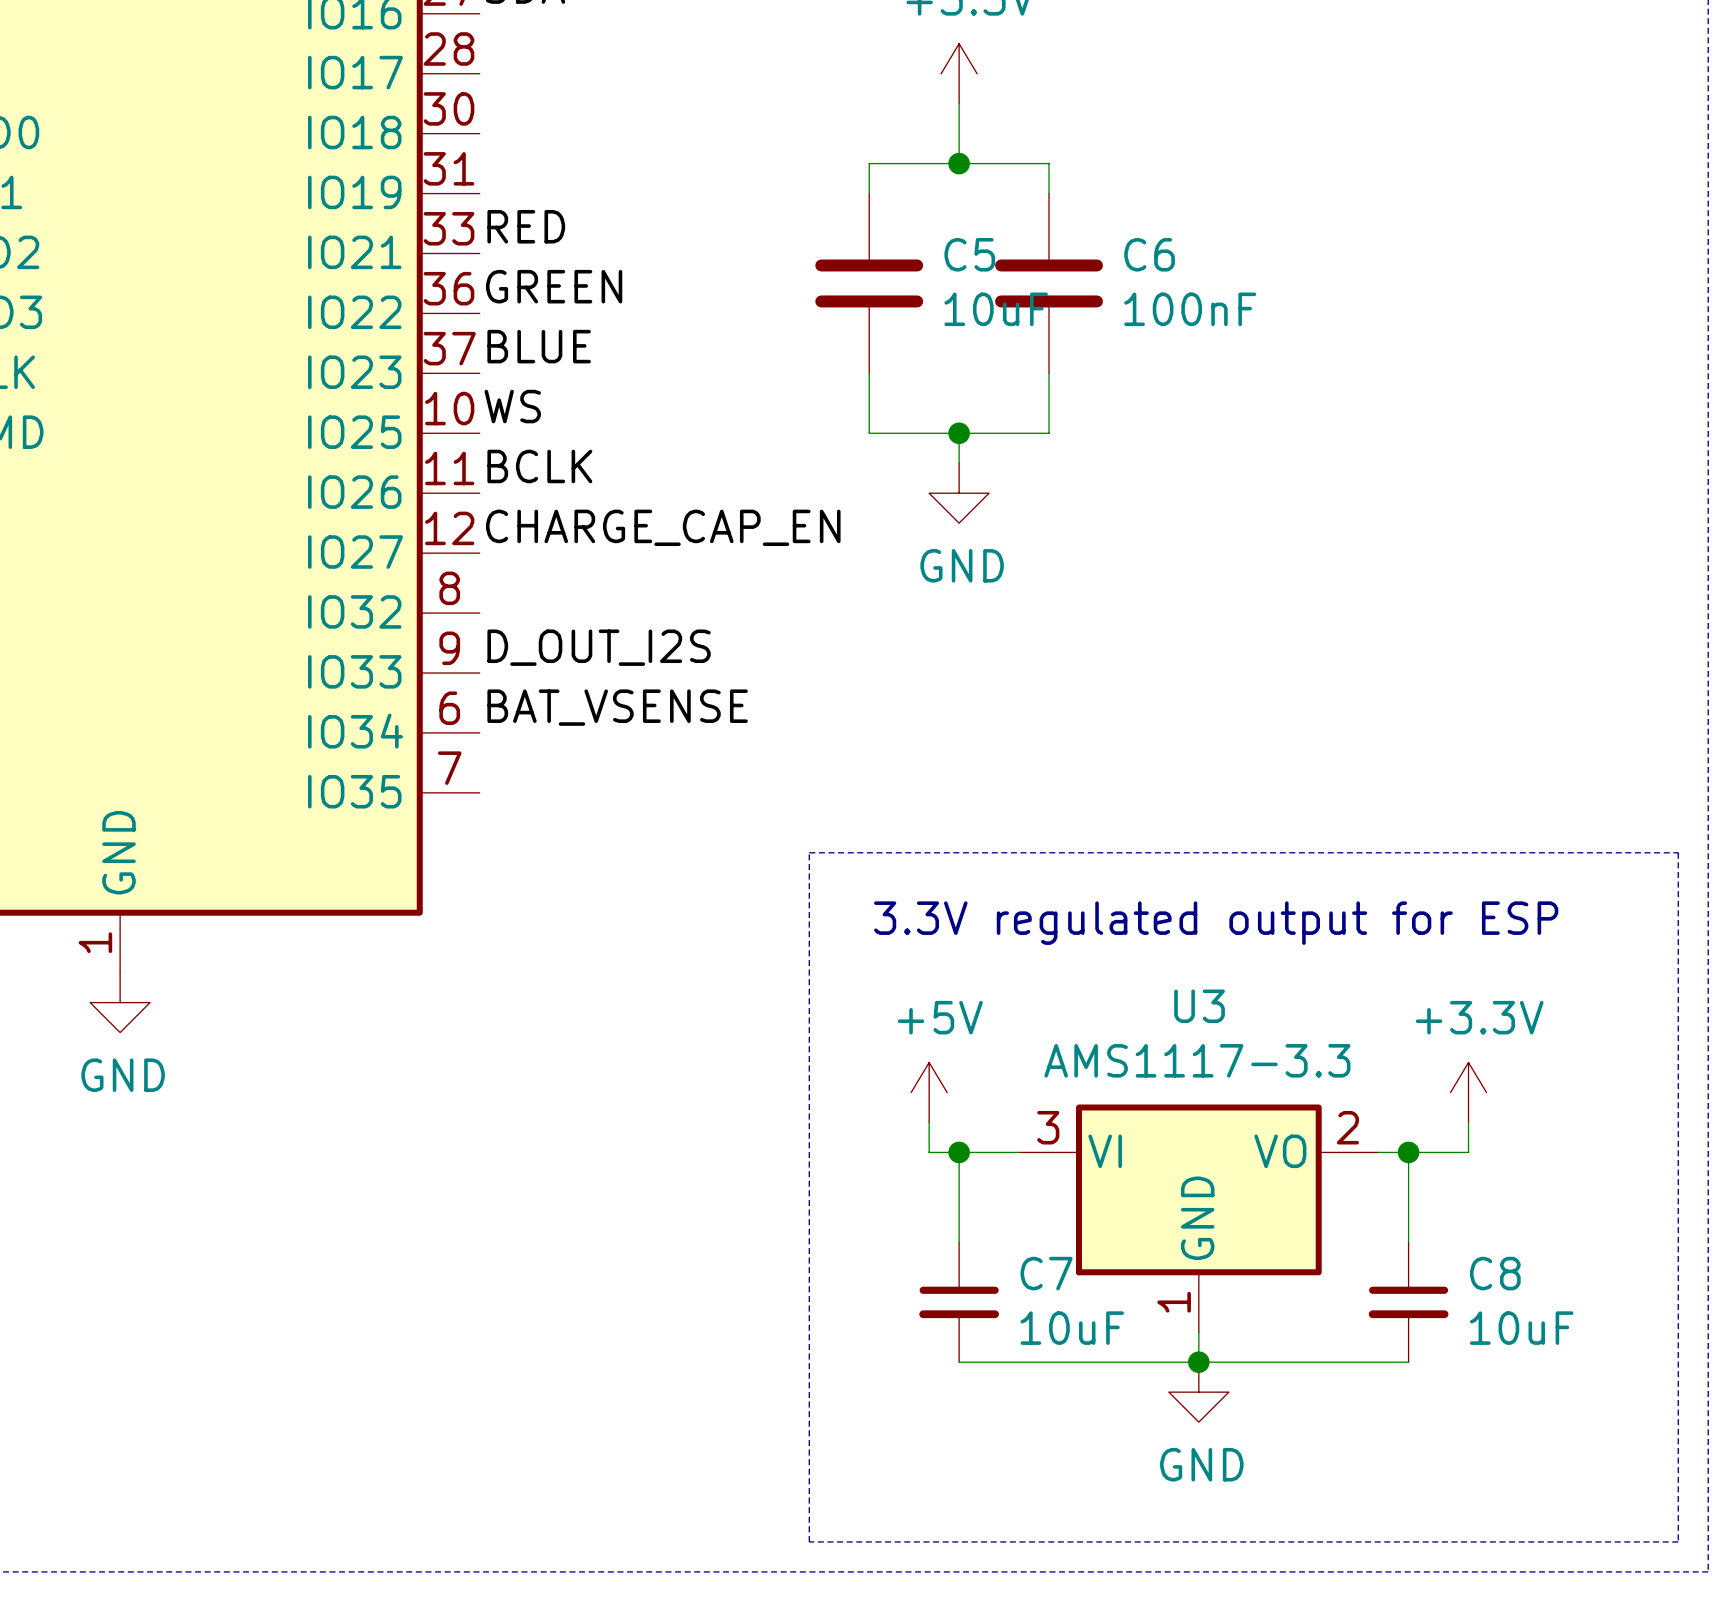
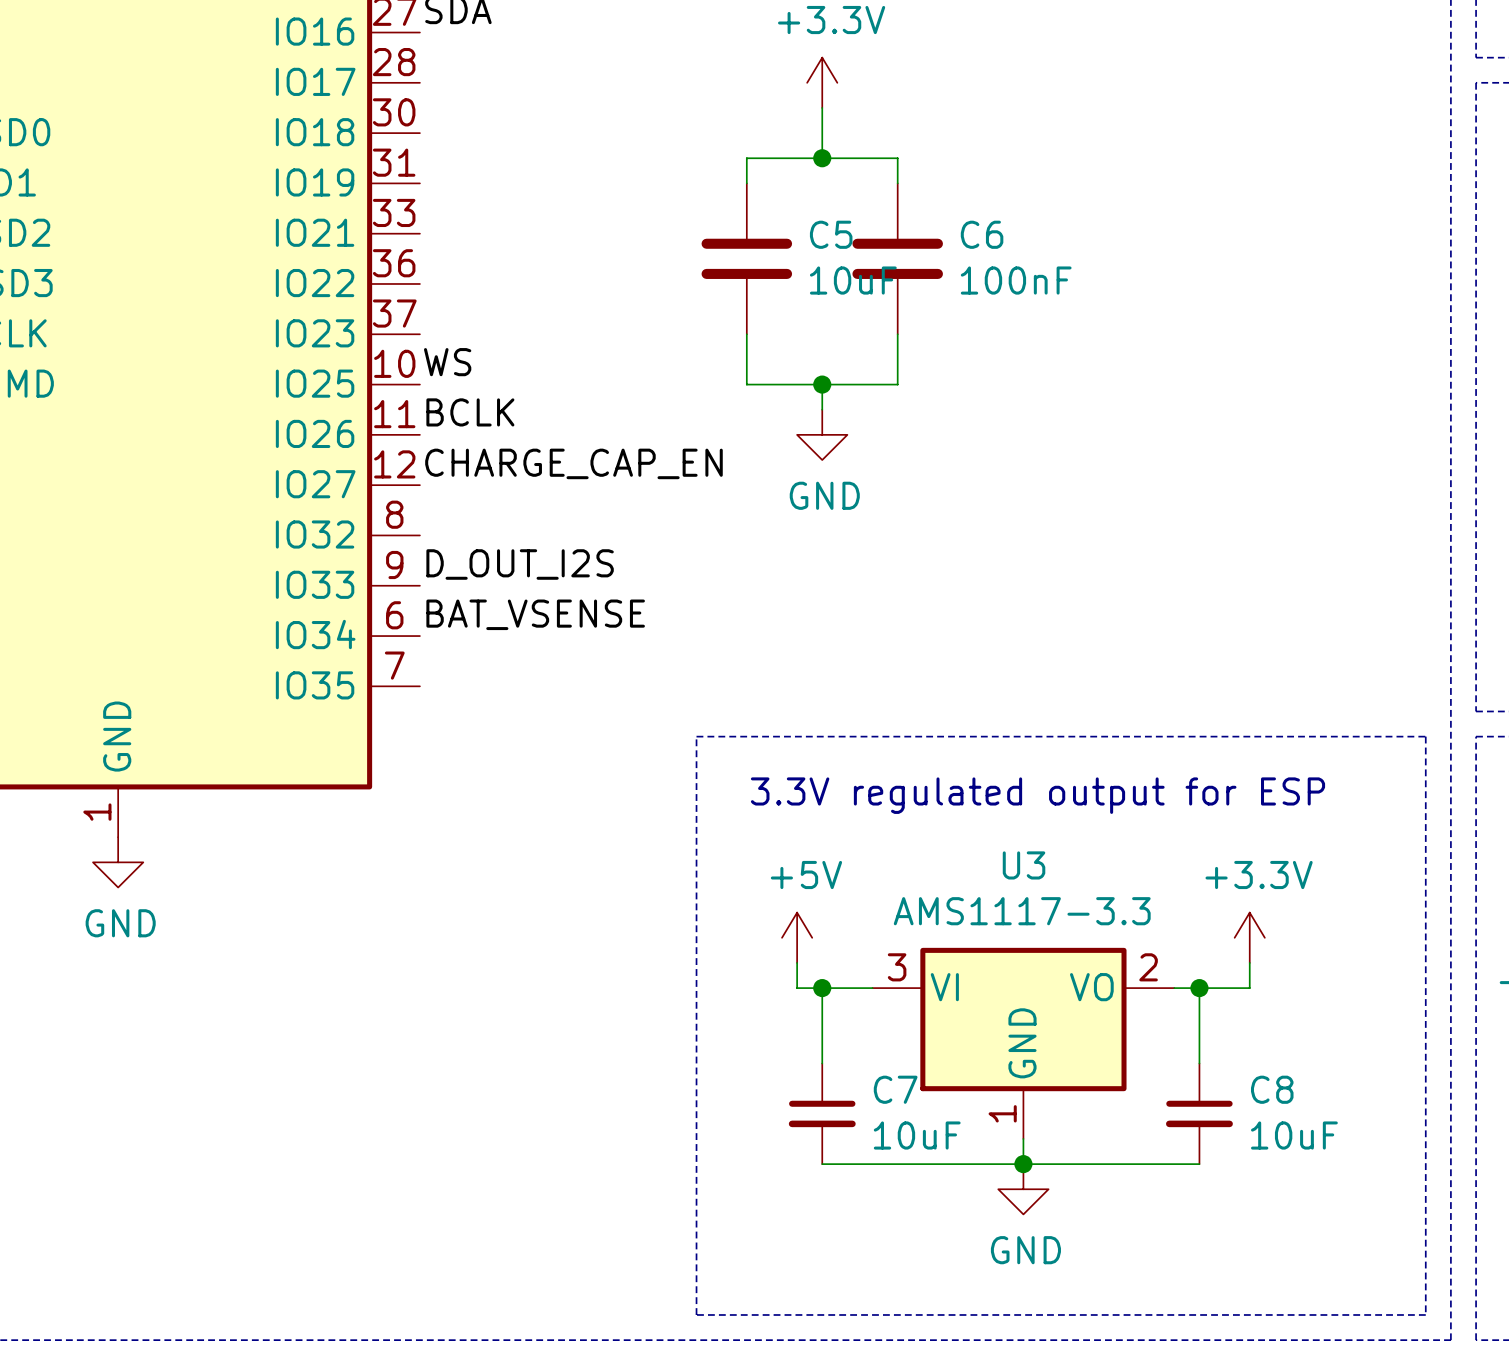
label: RED (526, 226) -> none
label: GREEN (554, 286) -> none
label: BLUE (539, 346) -> none

